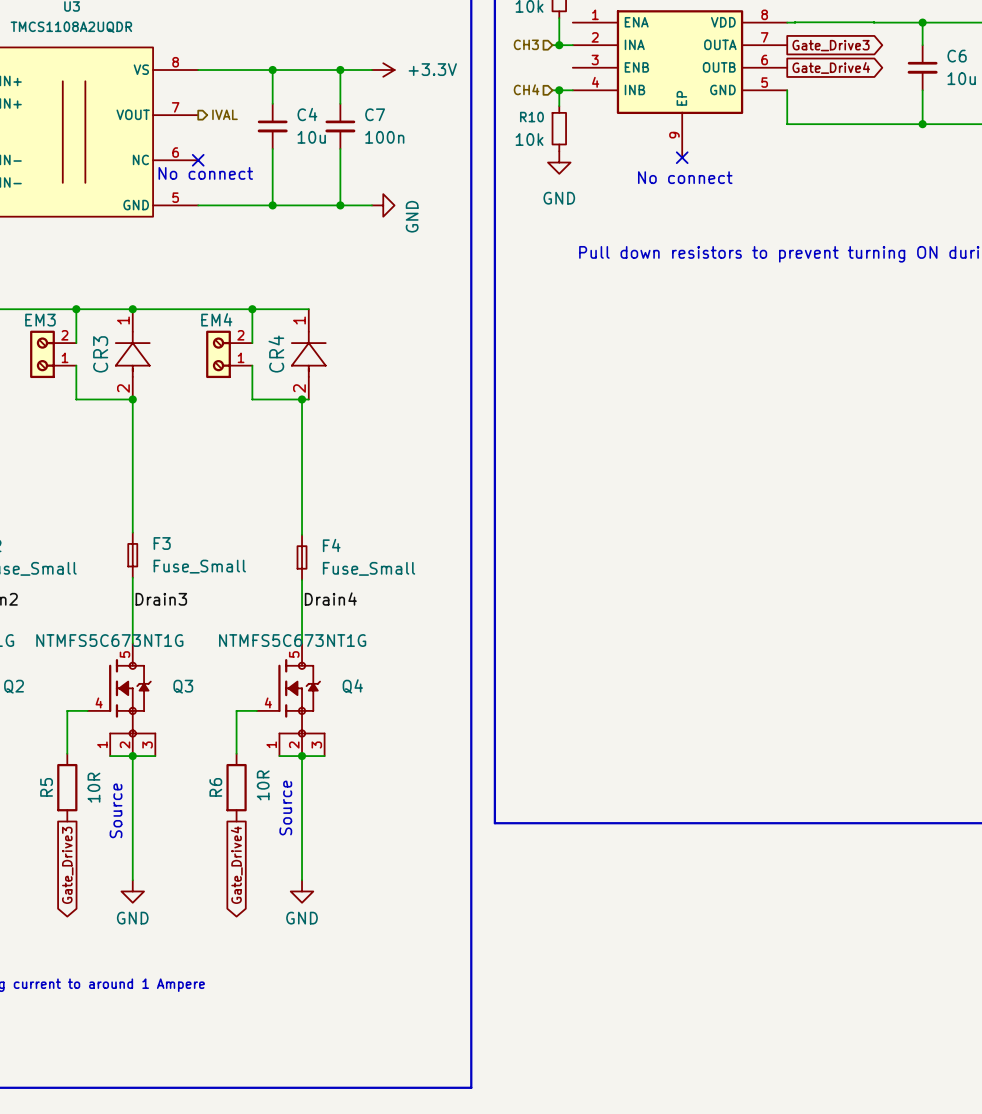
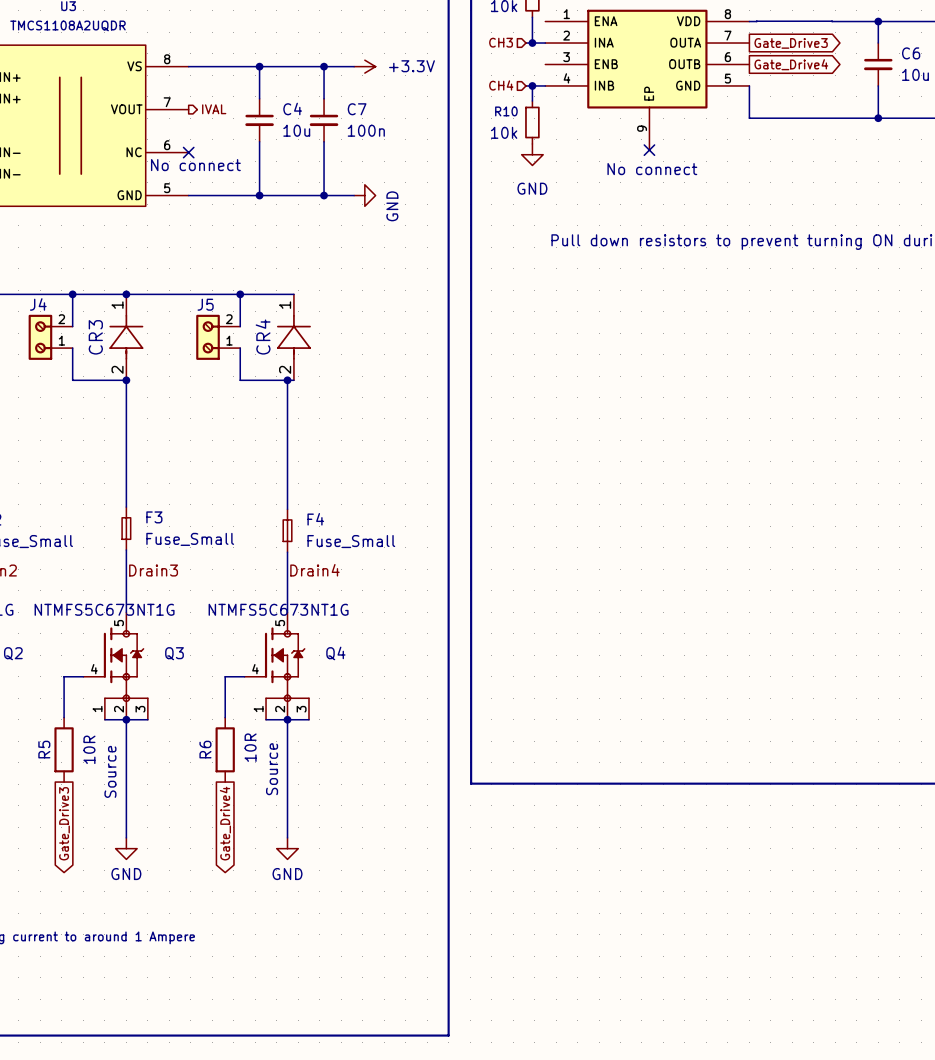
EM4 name: EM4 (216, 319) -> J5 (205, 304)
EM3 name: EM3 (40, 320) -> J4 (38, 304)

